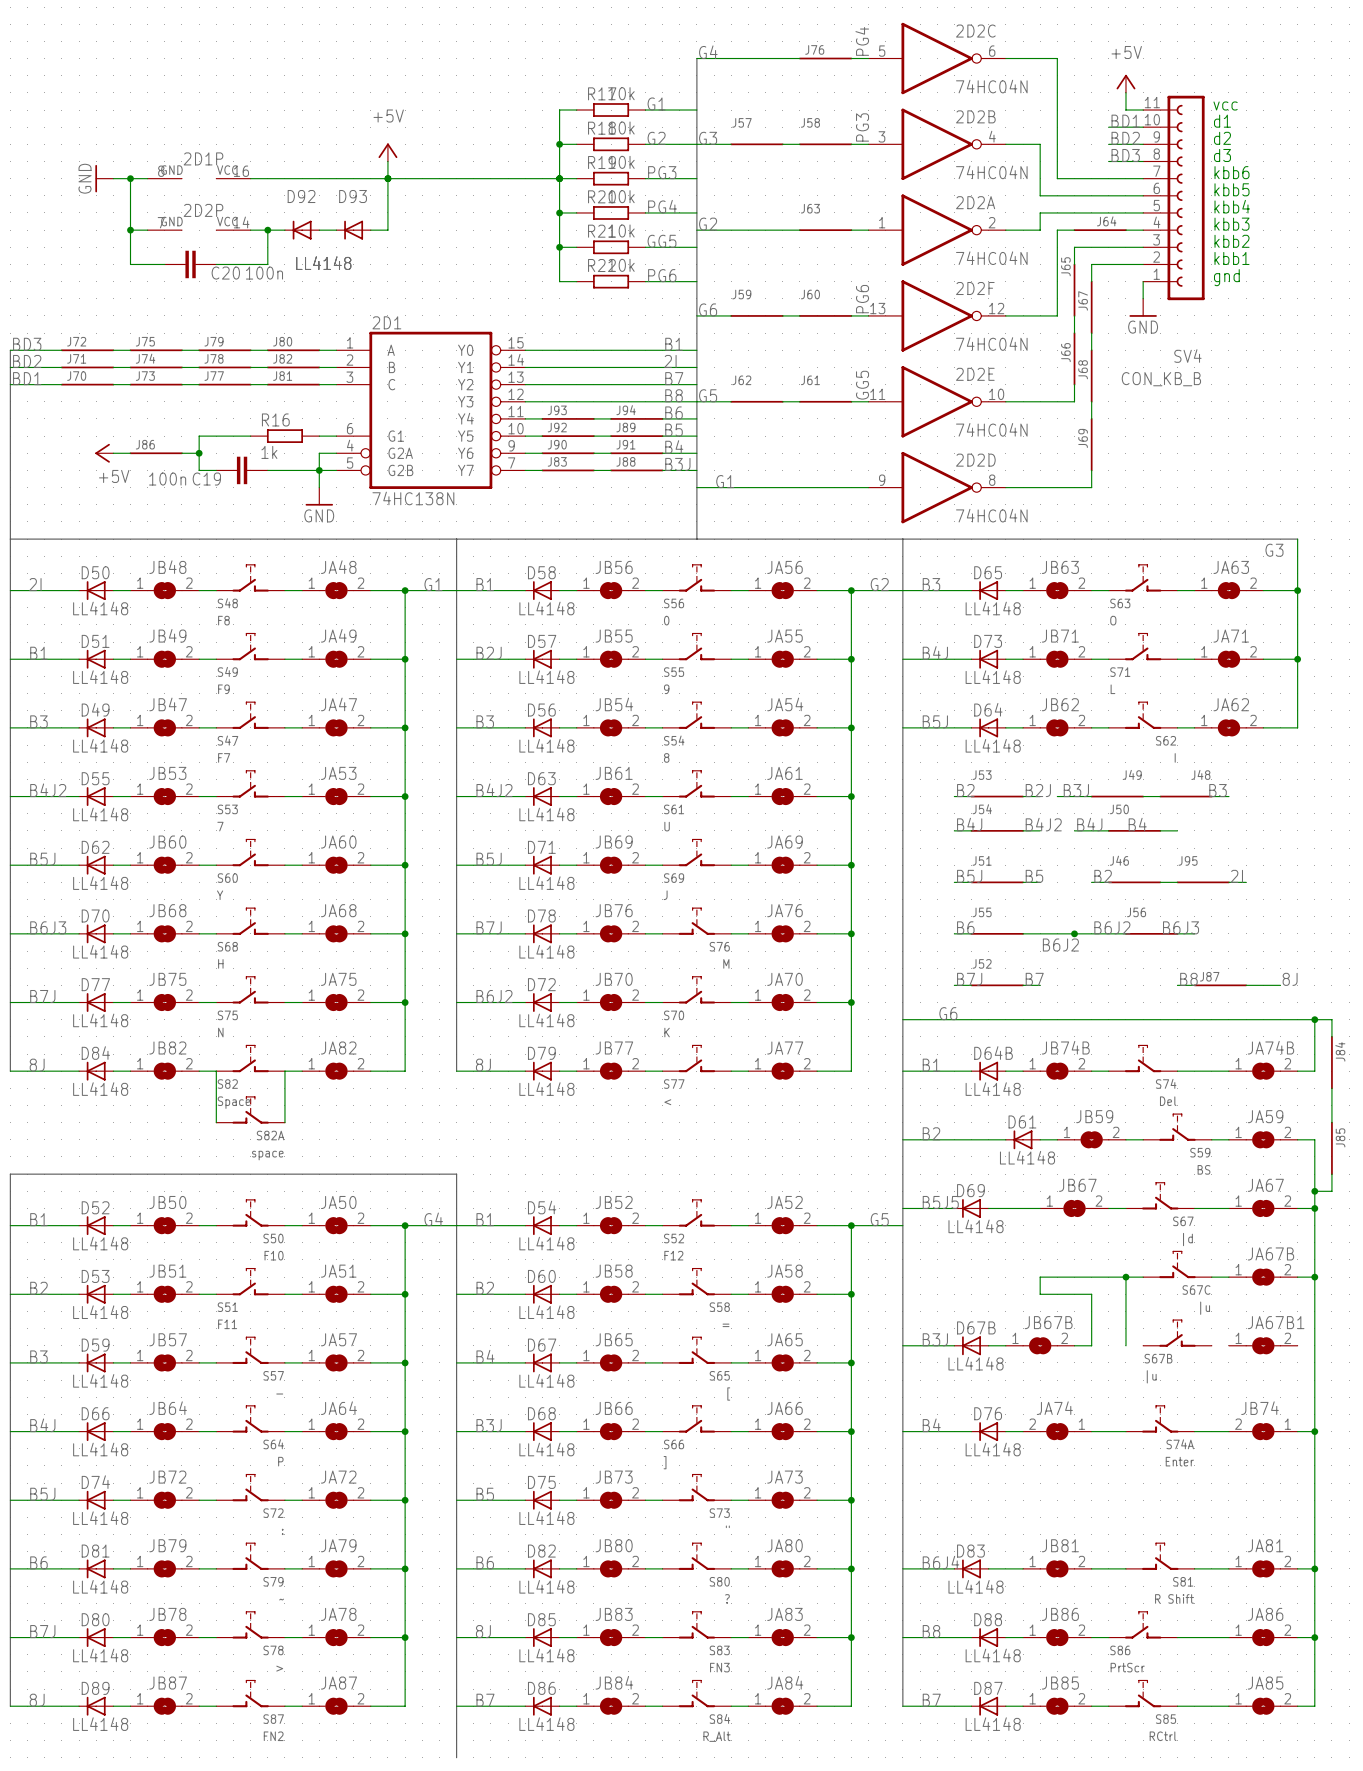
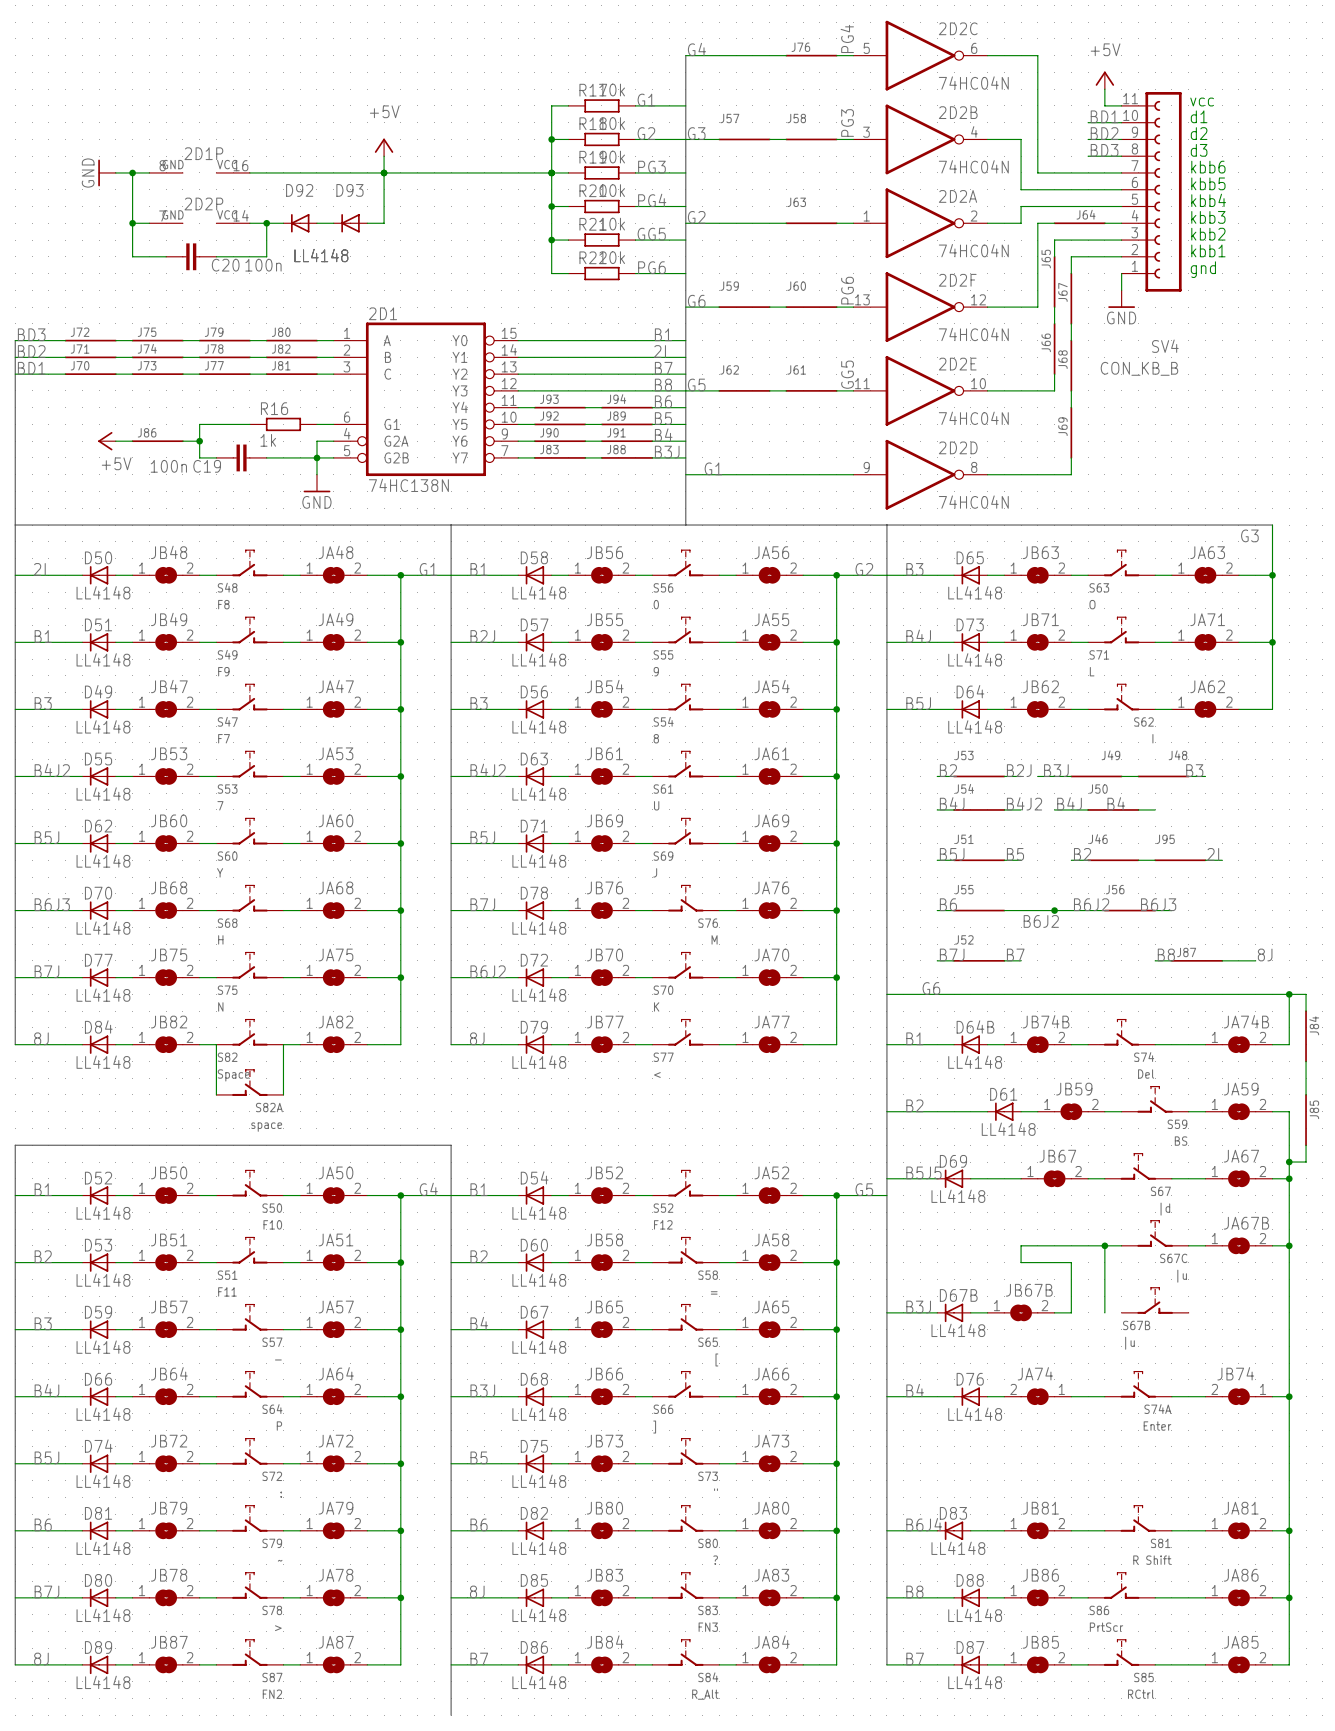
JA67B1: (1263, 1345) -> none

